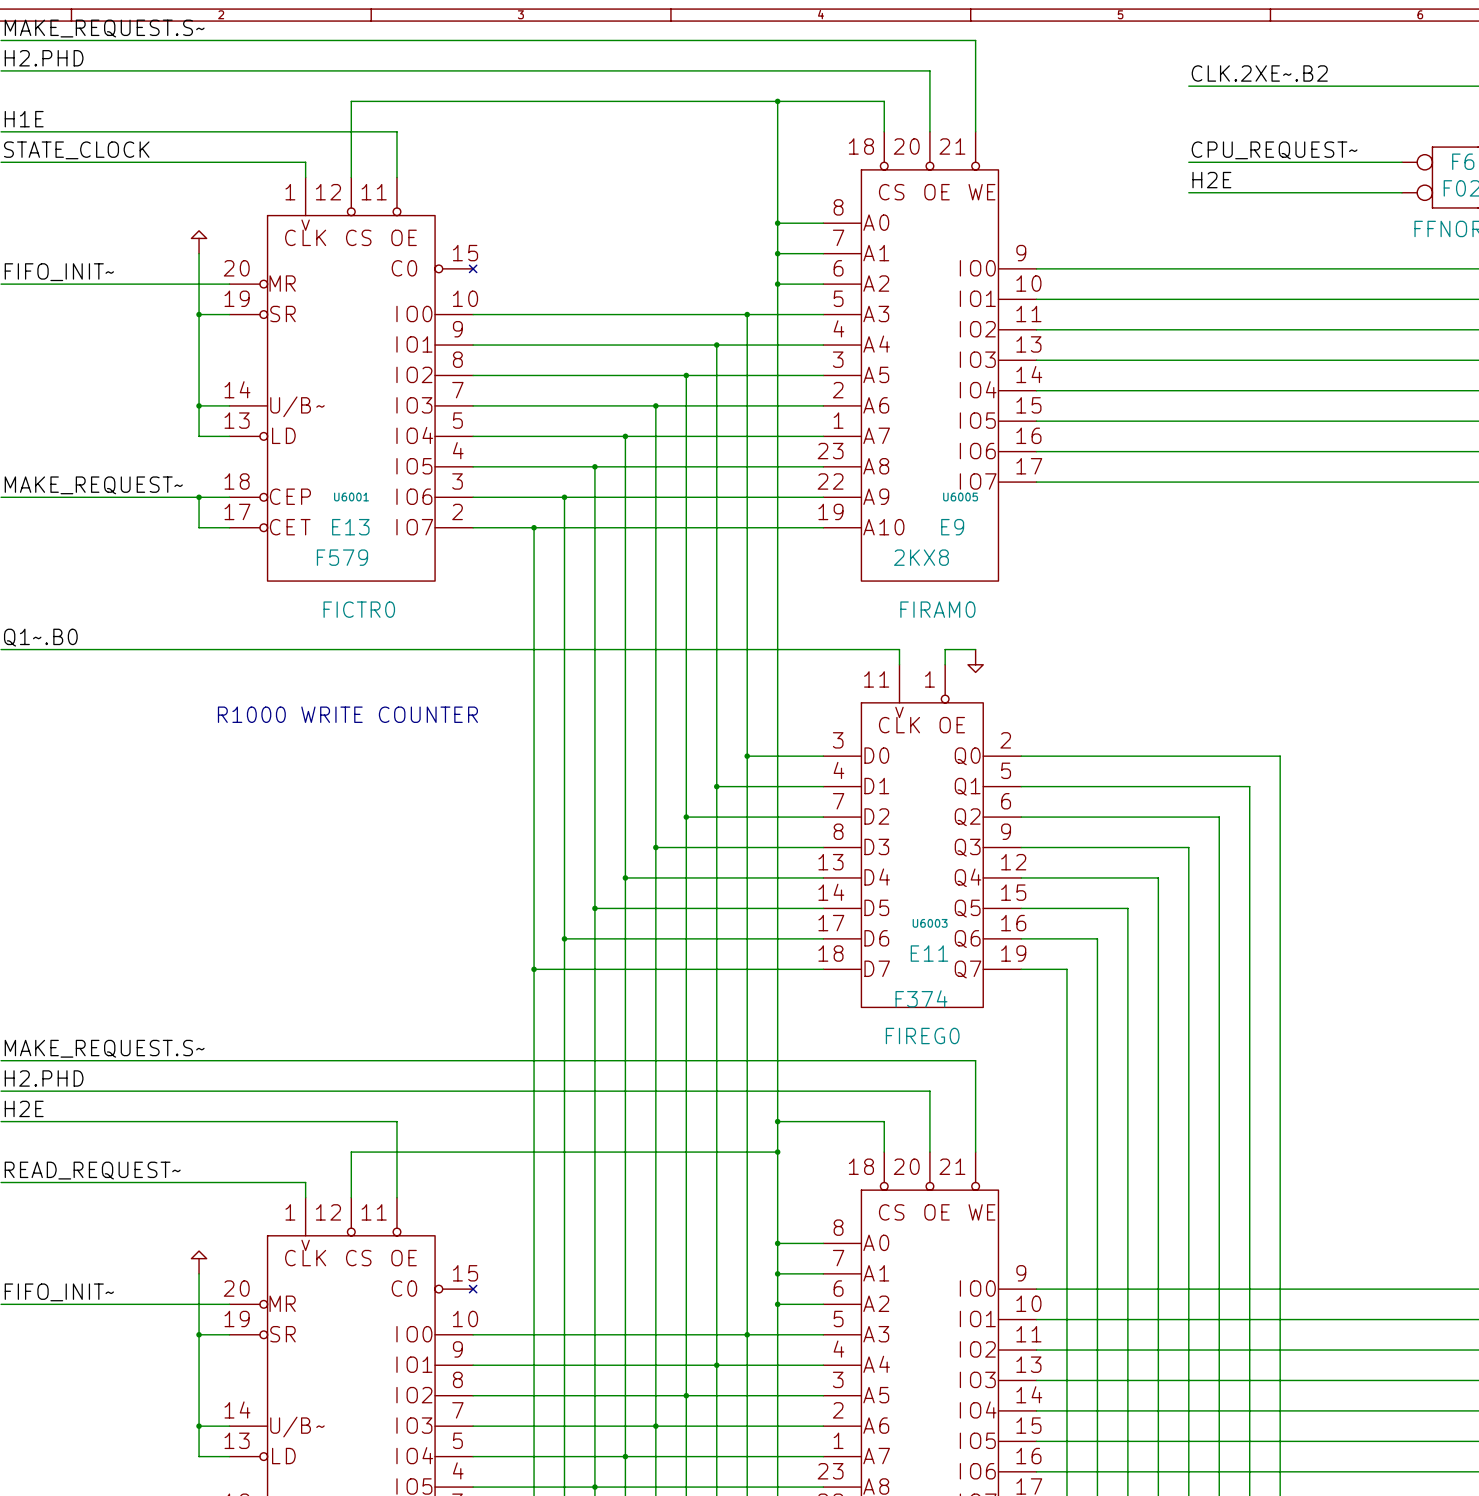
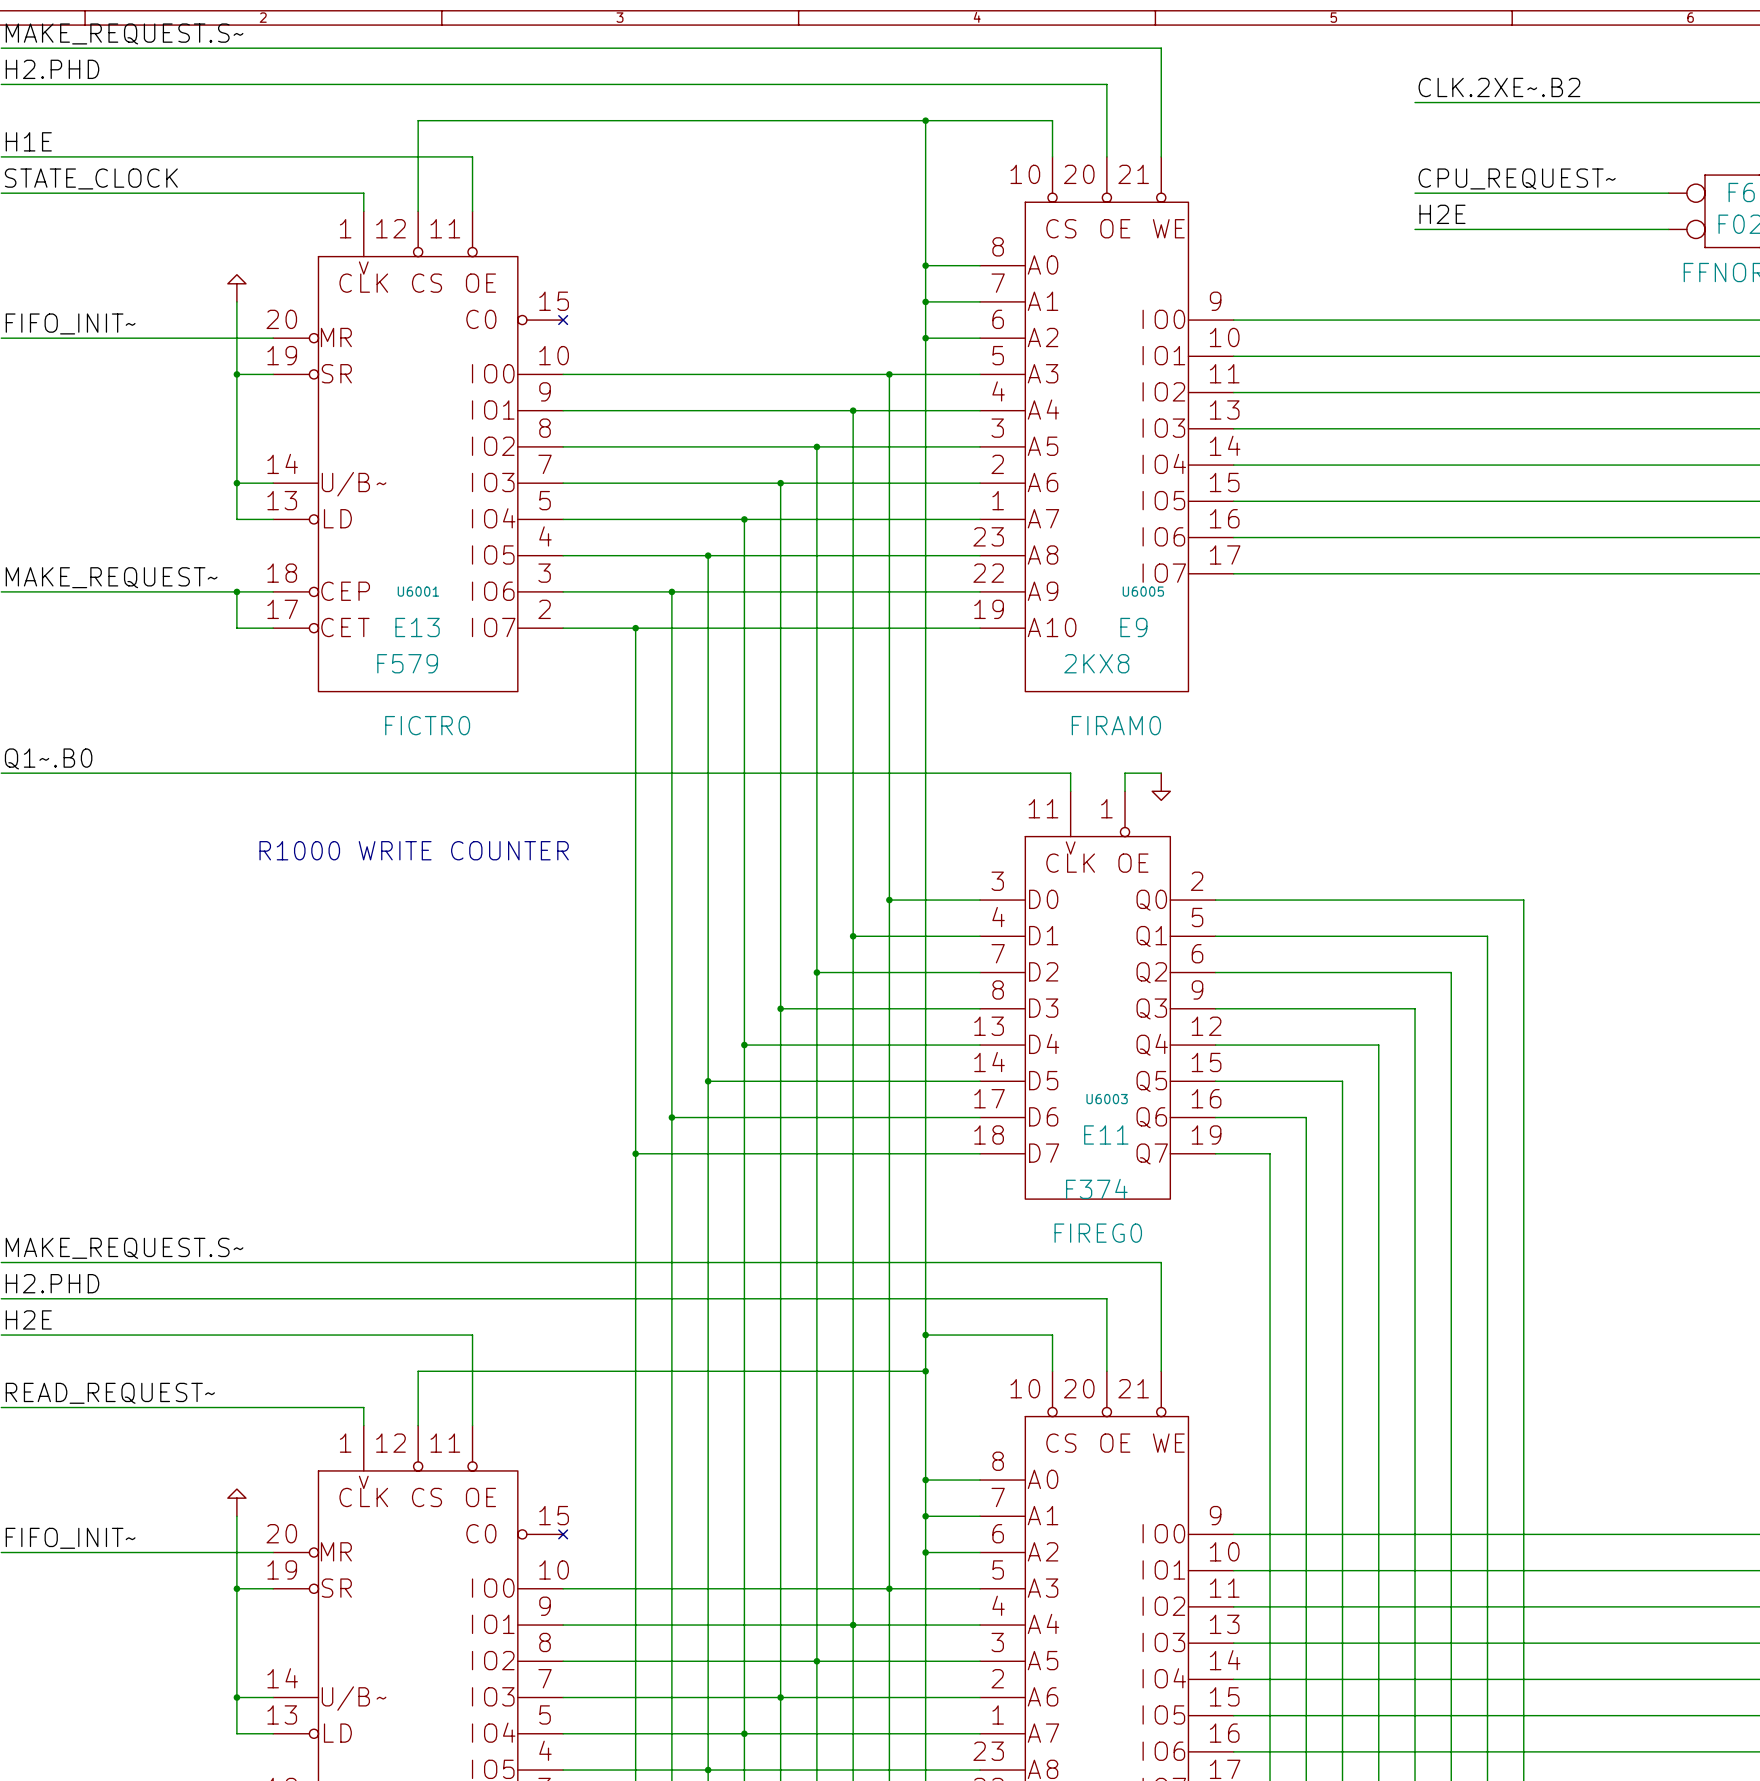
U6005 text: 8 (869, 146) -> 0 (1034, 174)
part text: 8 (869, 1166) -> 0 (1034, 1388)

